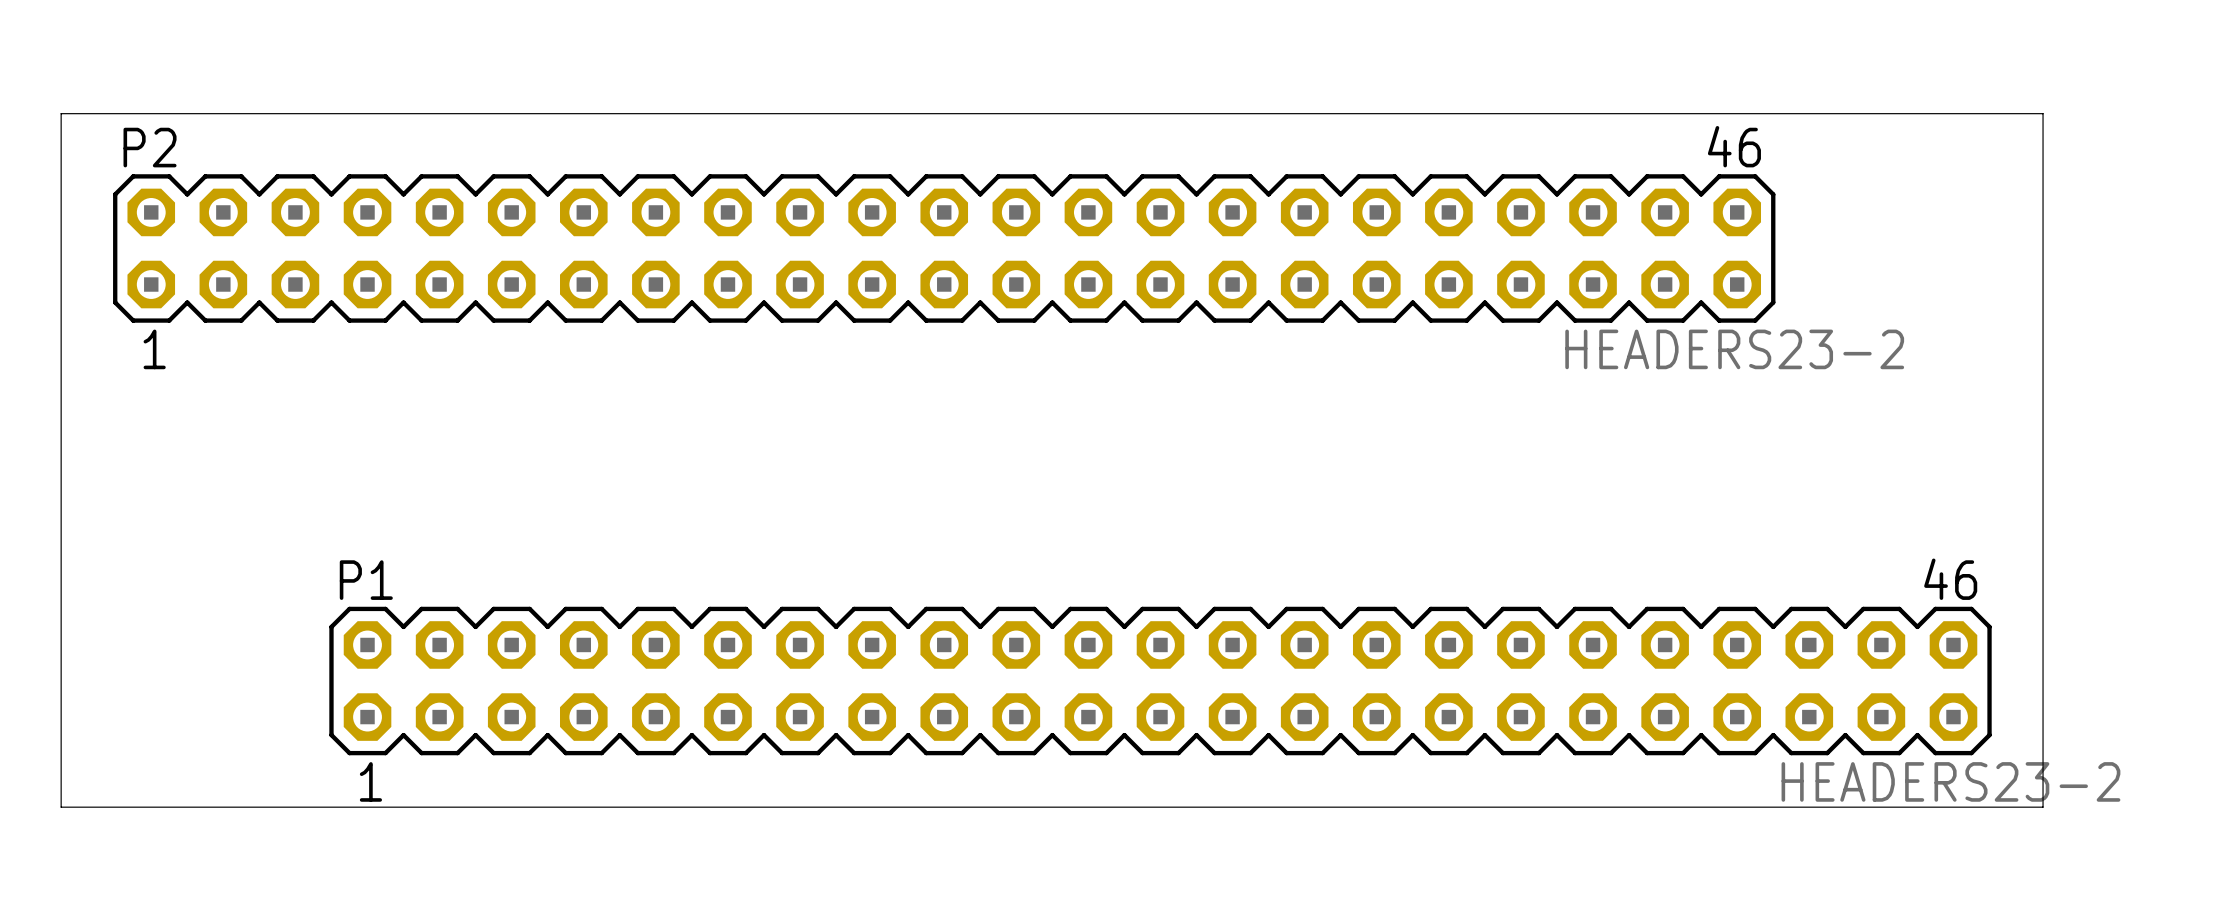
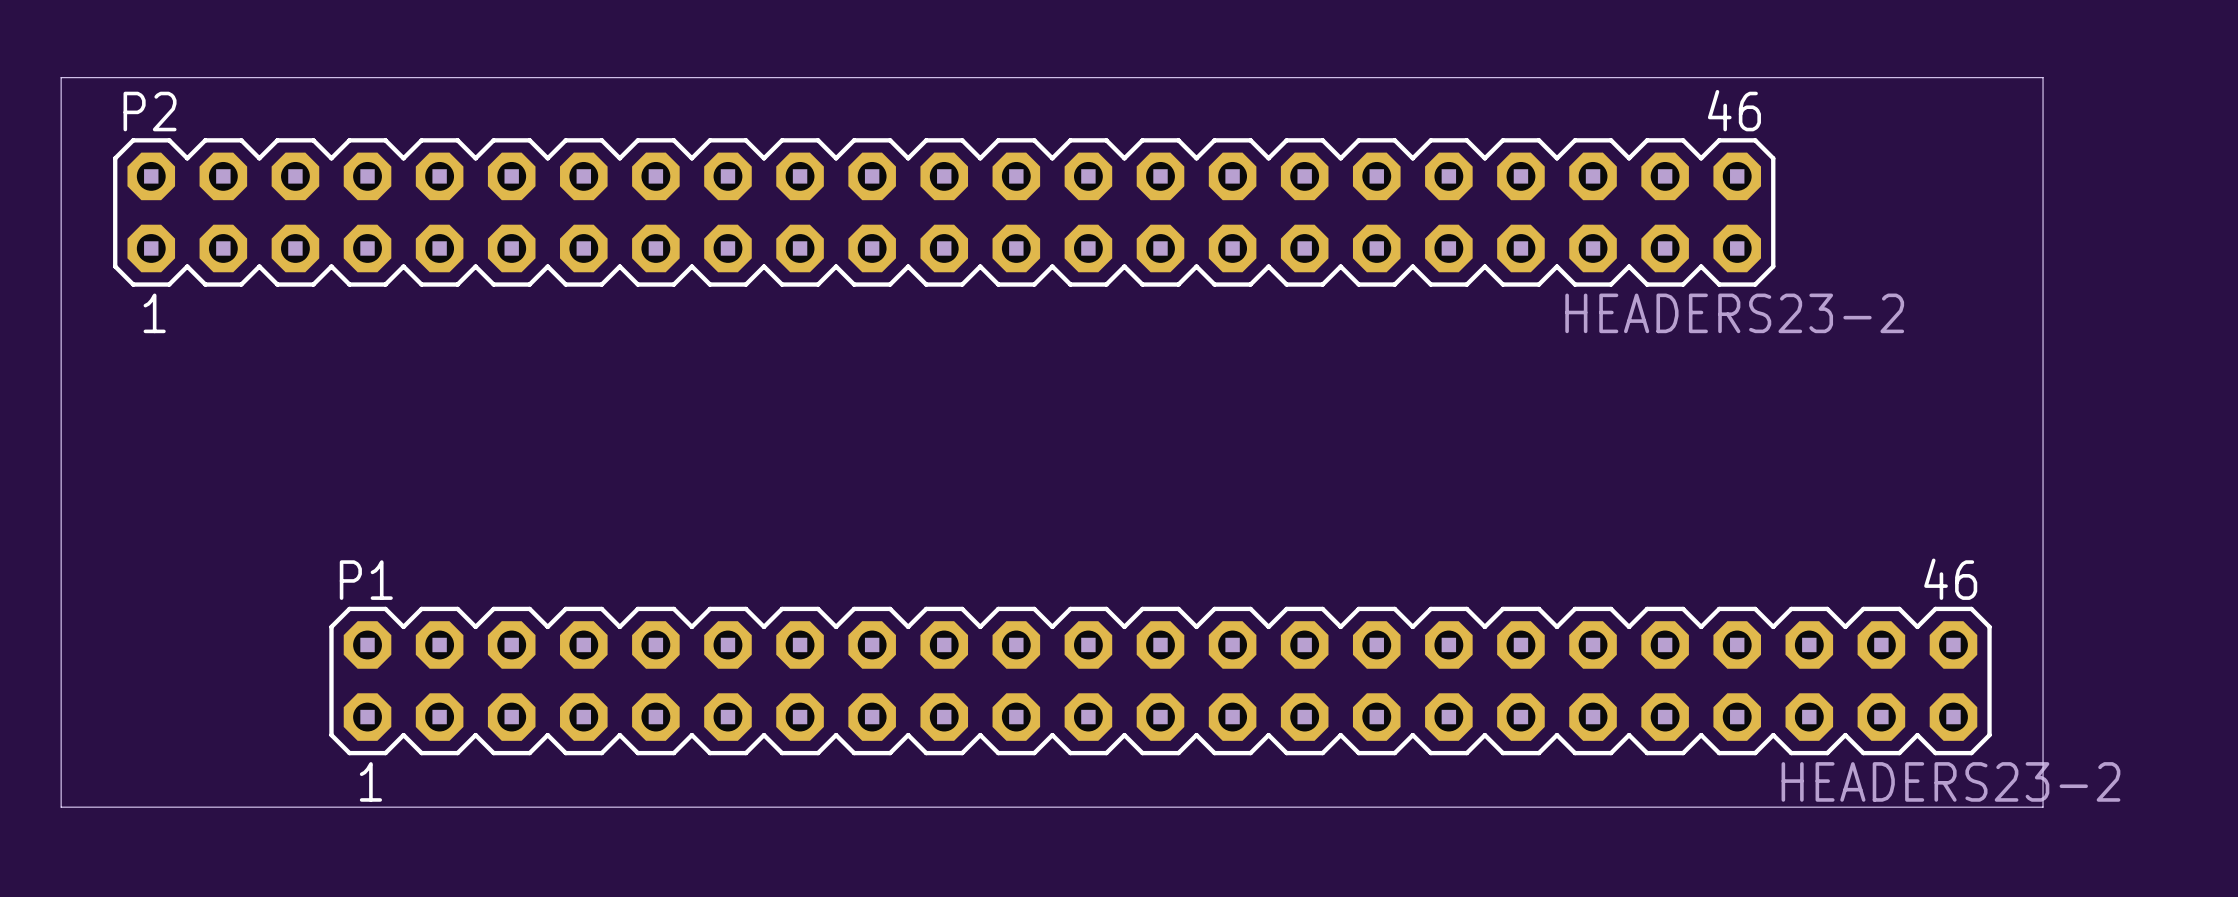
board edge: (61, 113) (2043, 113) -> (61, 113) (61, 77) (2043, 77) (2043, 113)
P2 position: (944, 248) -> (944, 212)

